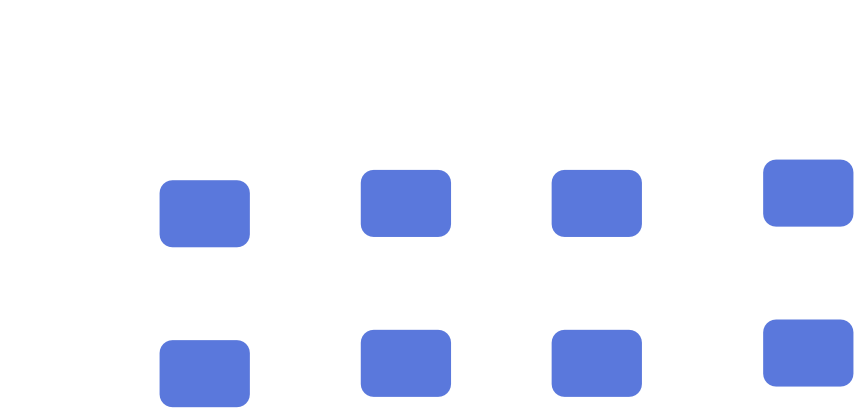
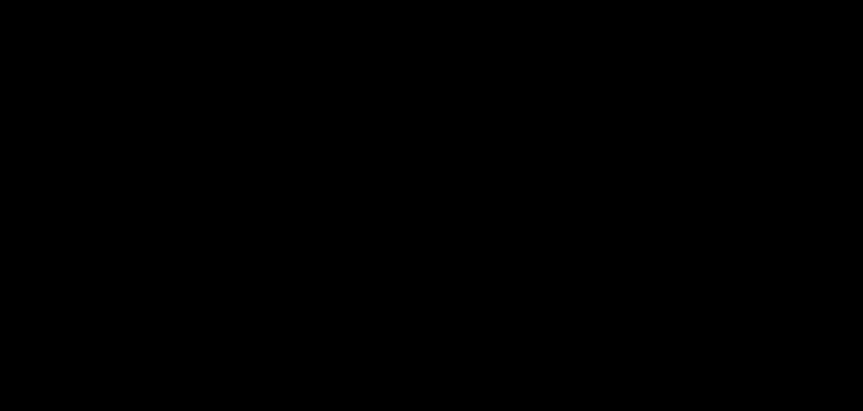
part: (808, 273) -> none
part: (405, 283) -> none
part: (596, 283) -> none
part: (204, 293) -> none

